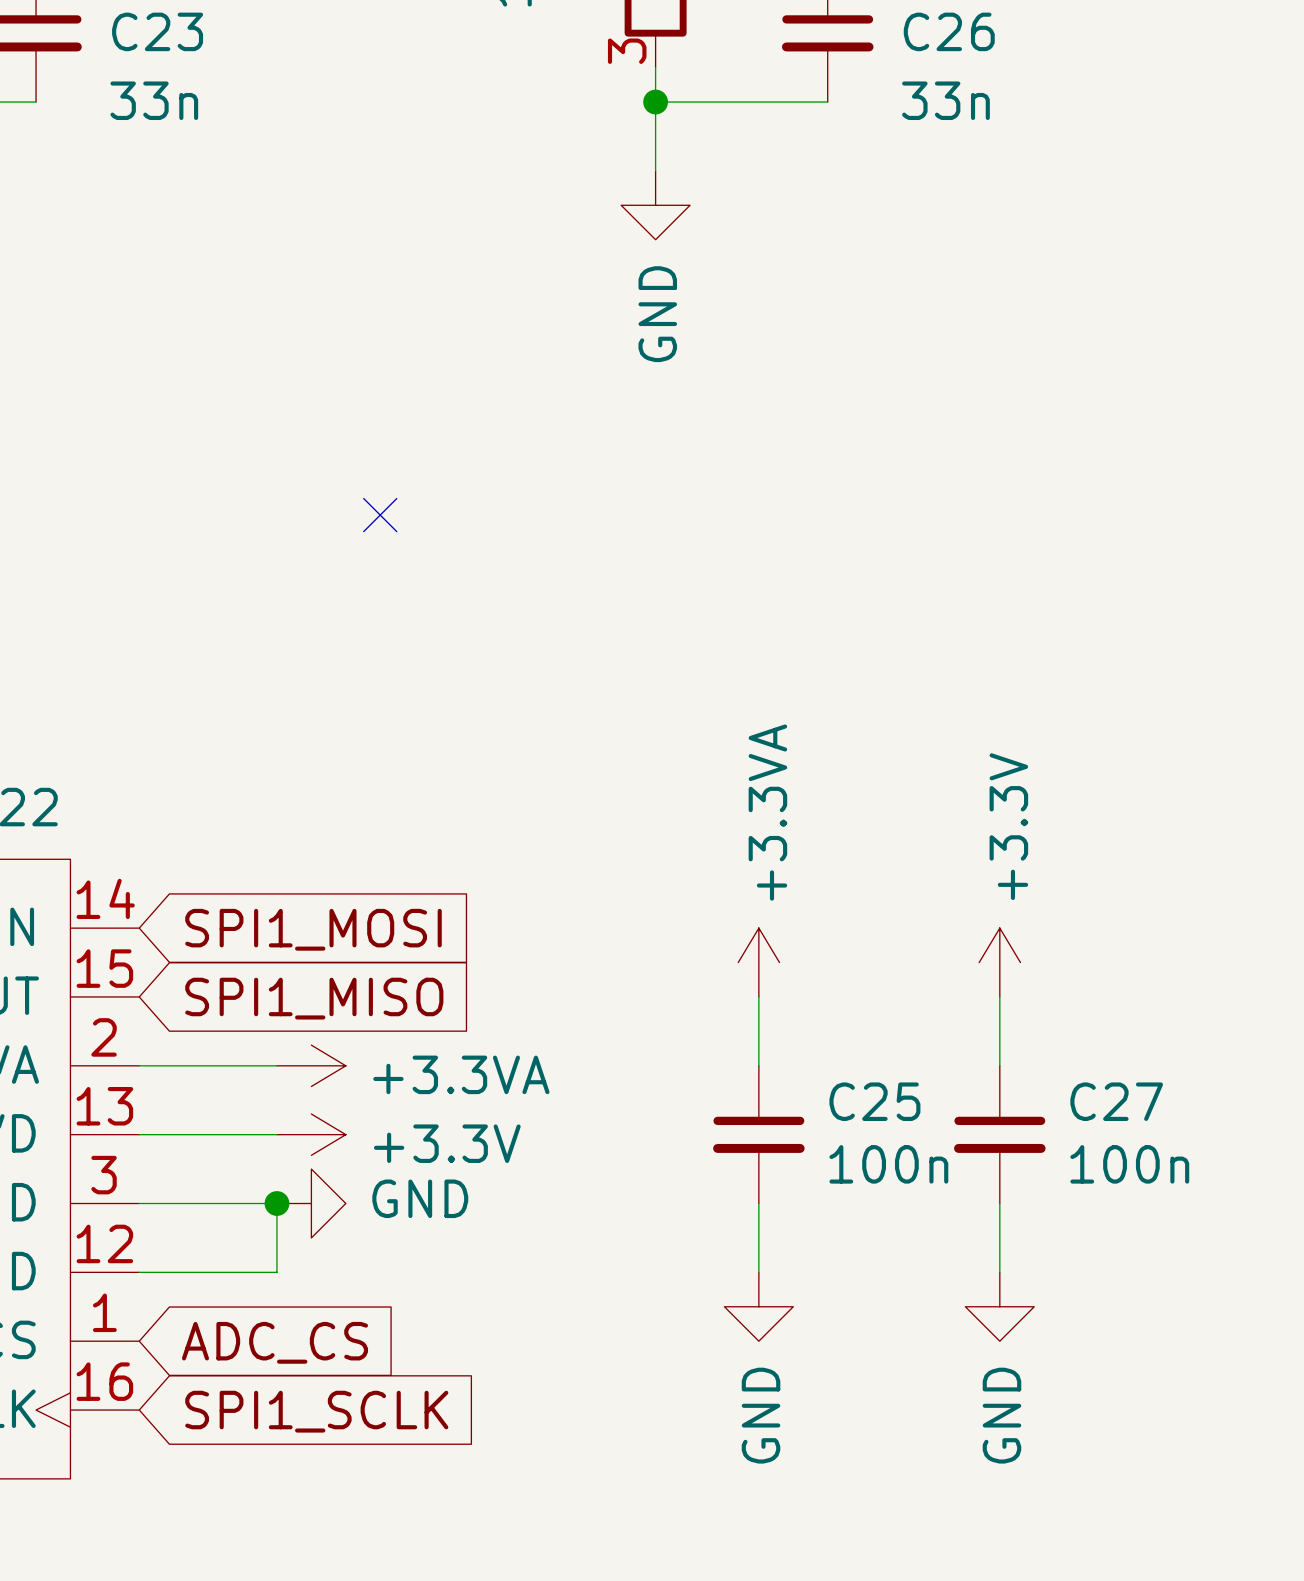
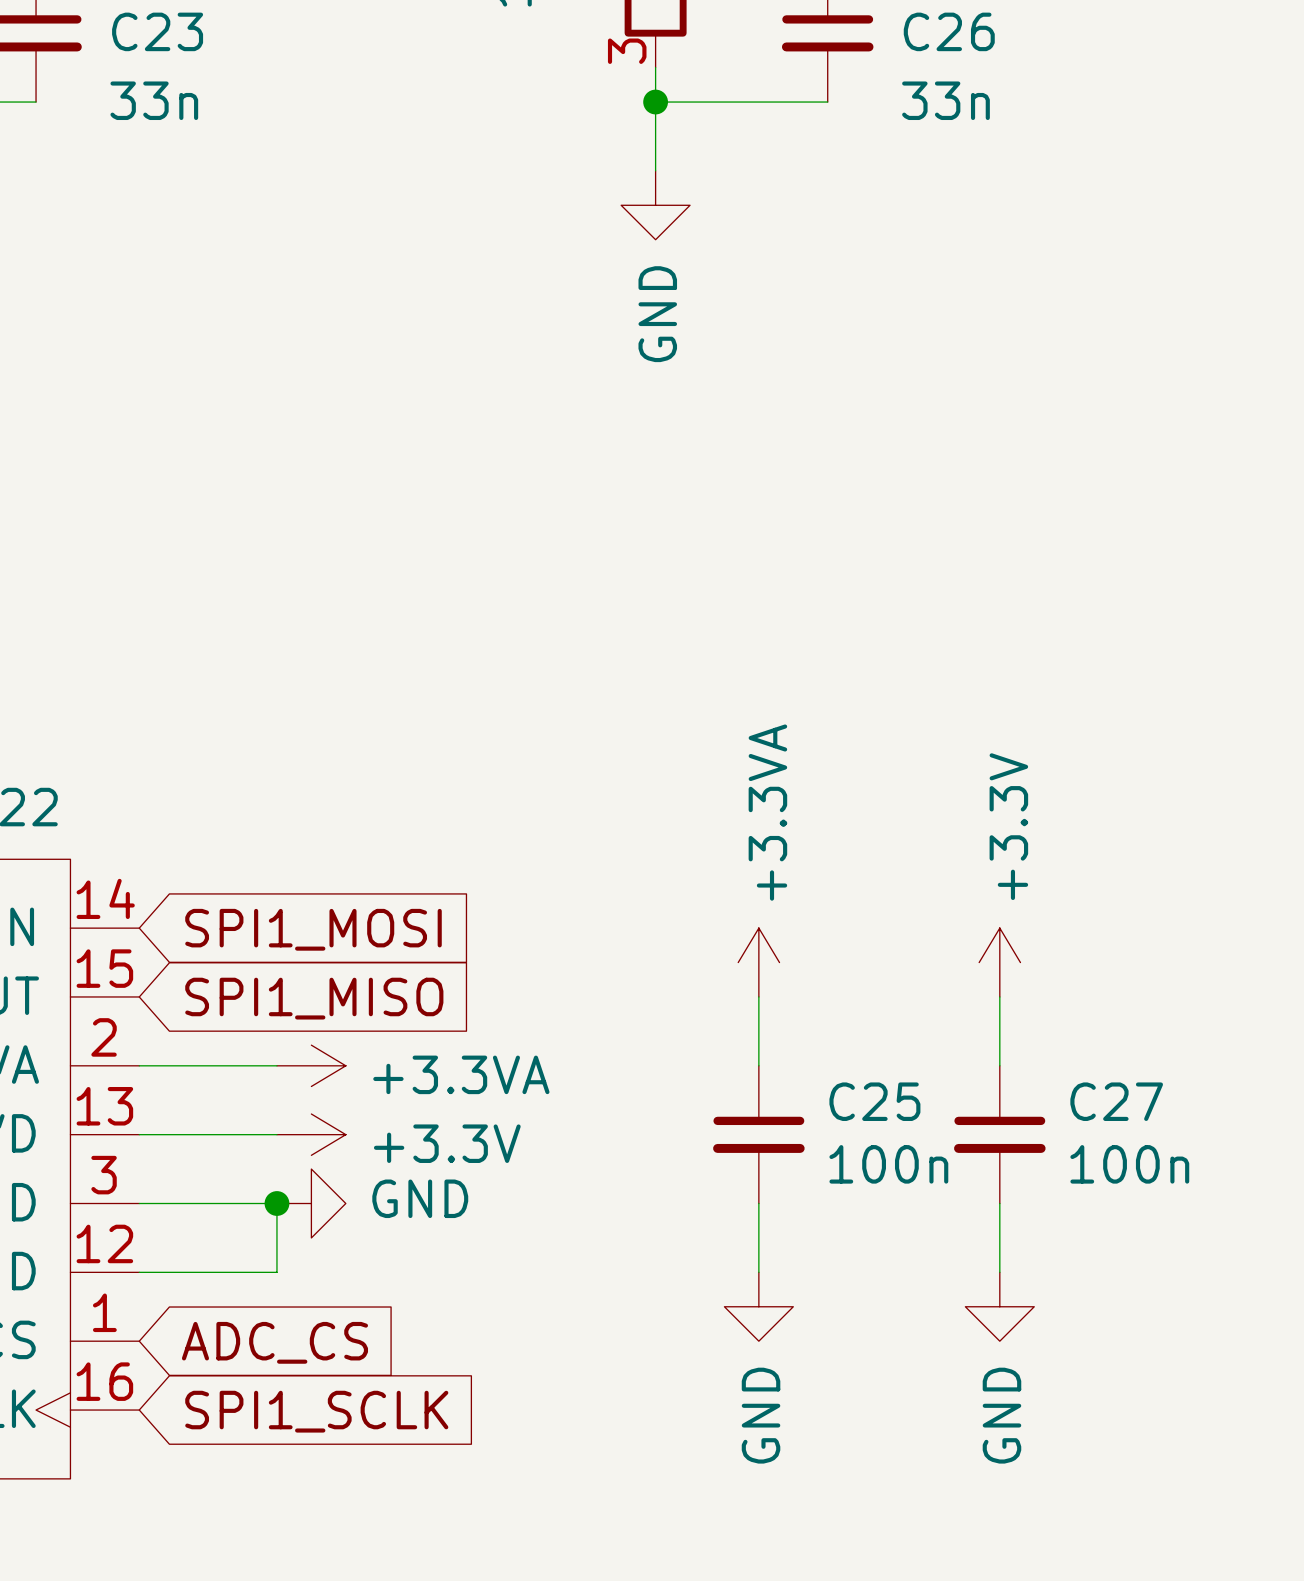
no-connect mark: (380, 515) -> none

